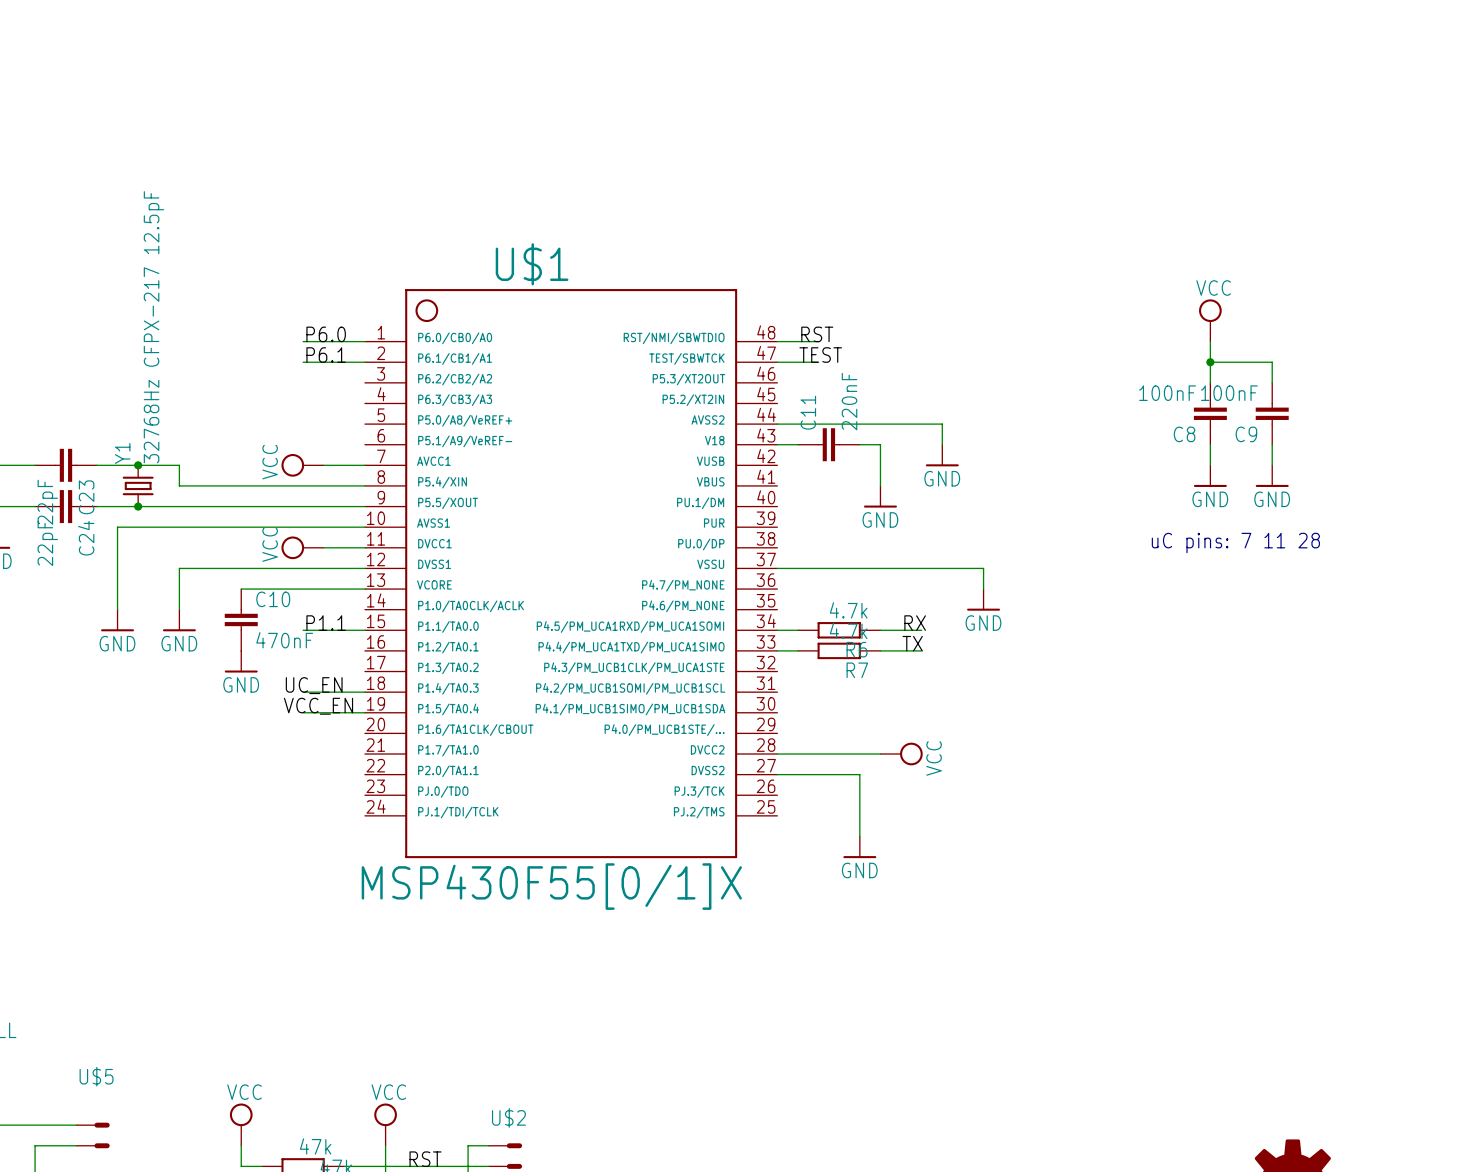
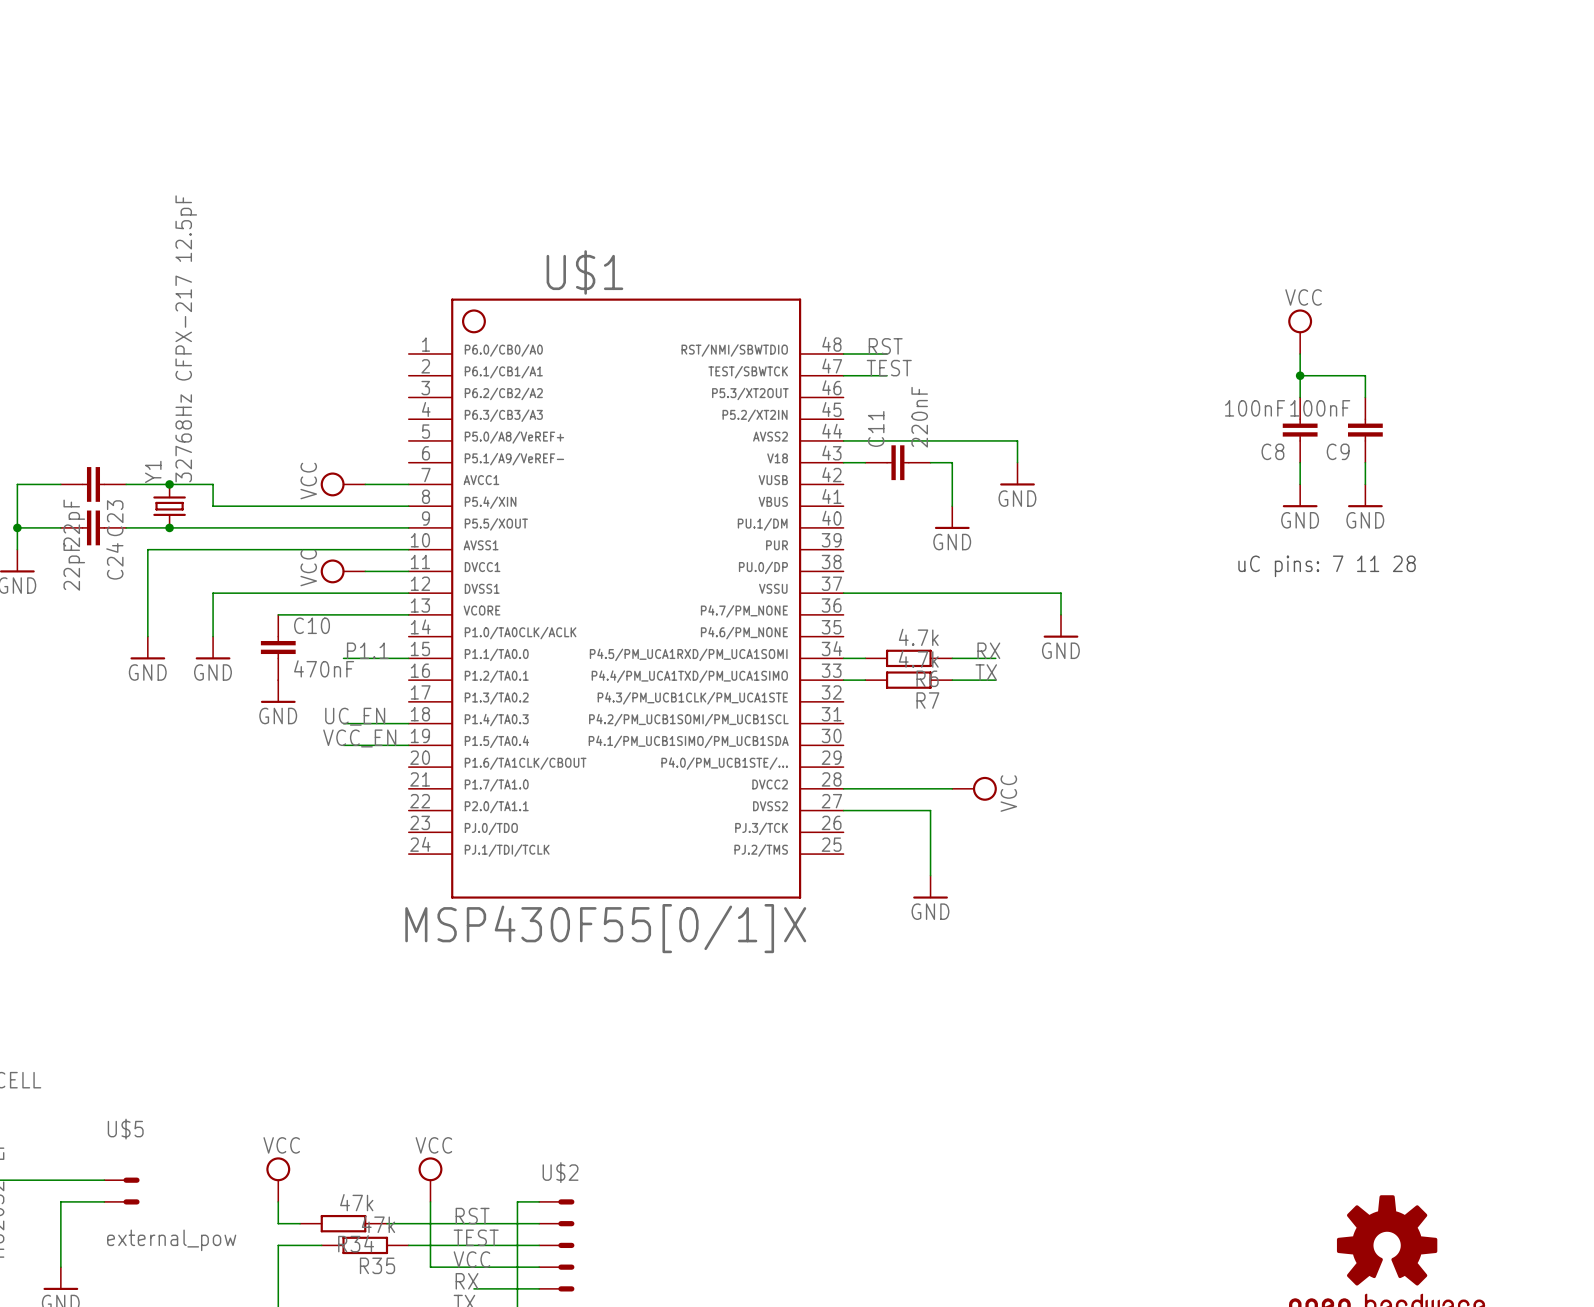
label: P6.0 (326, 334) -> none
wire: (303, 341) (364, 341) -> none
label: P6.1 (326, 355) -> none
wire: (303, 362) (364, 362) -> none

